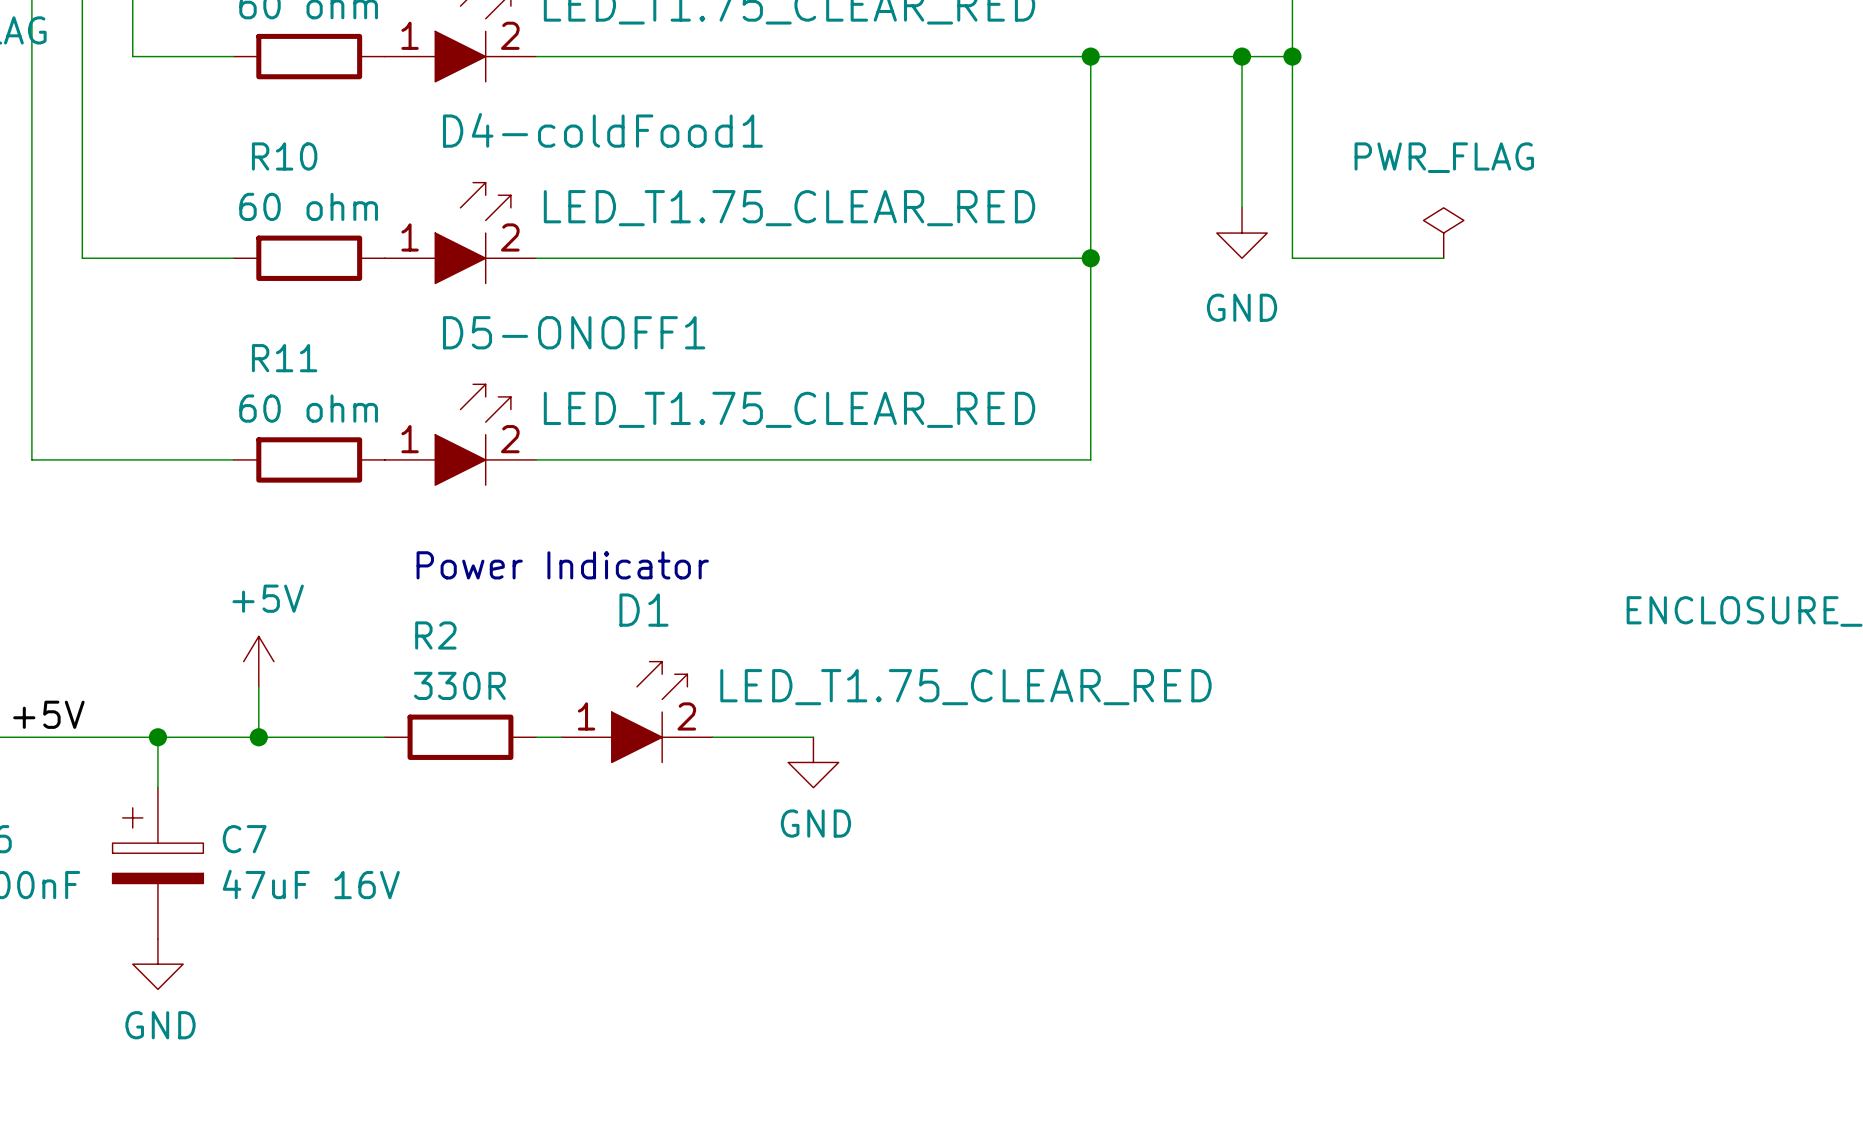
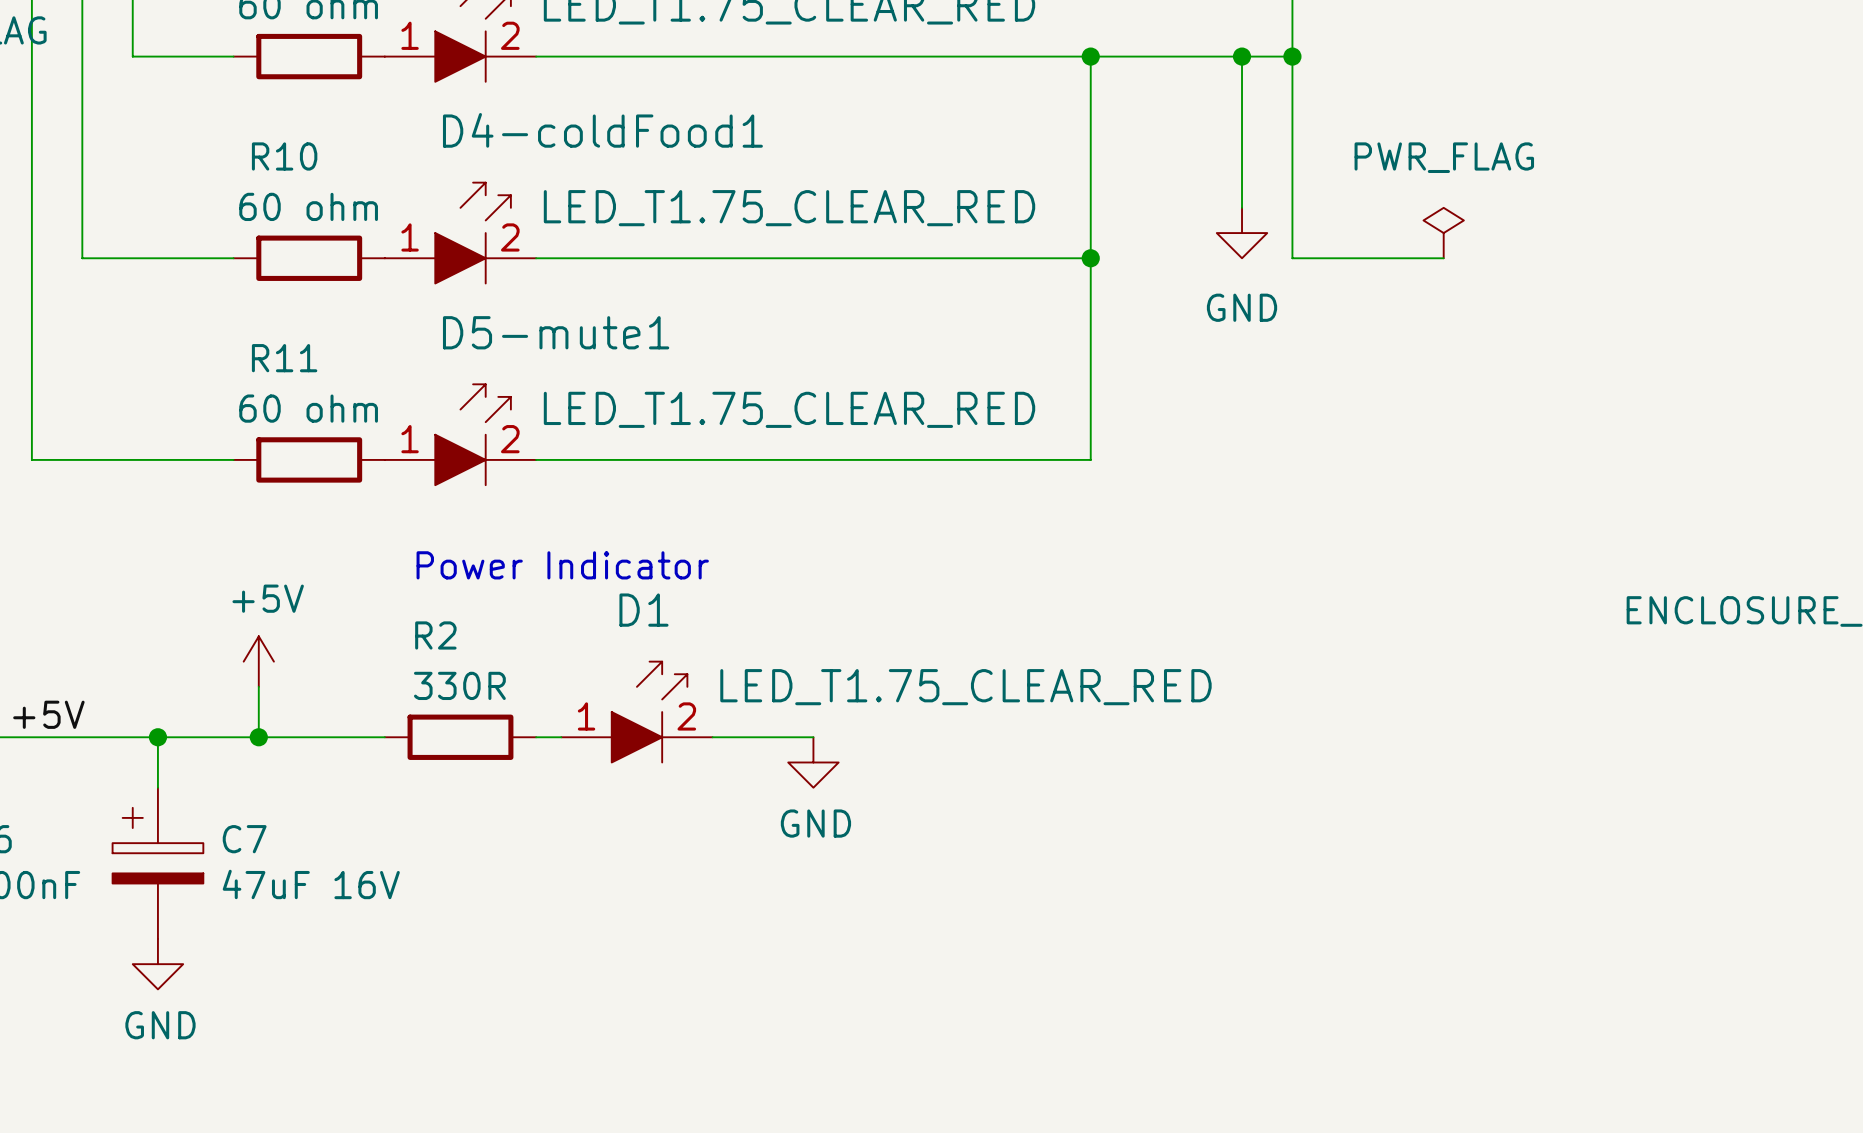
D5-ONOFF1 name: D5-ONOFF1 (574, 332) -> D5-mute1 (556, 332)

